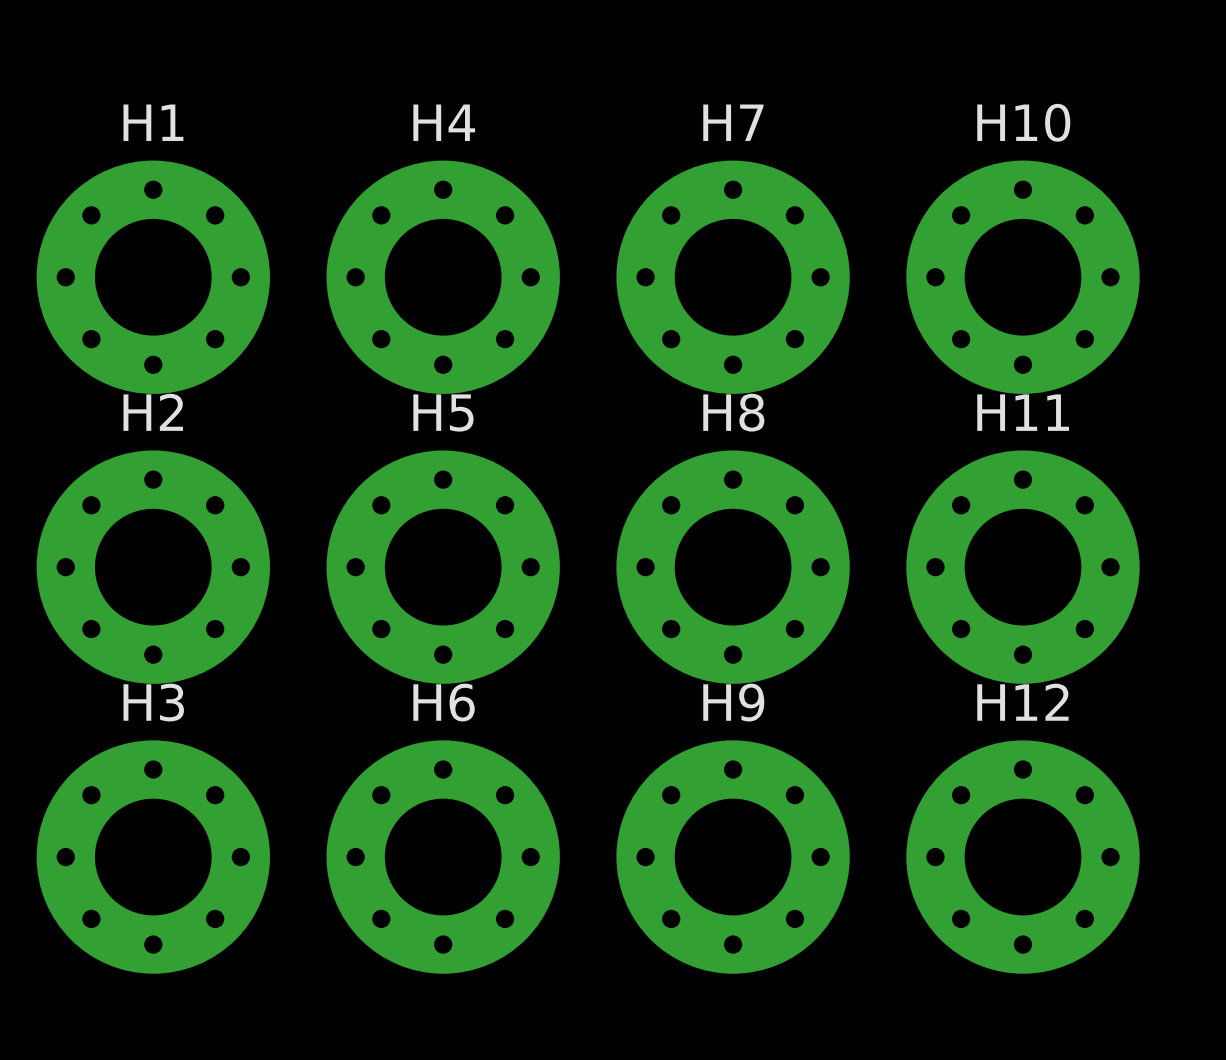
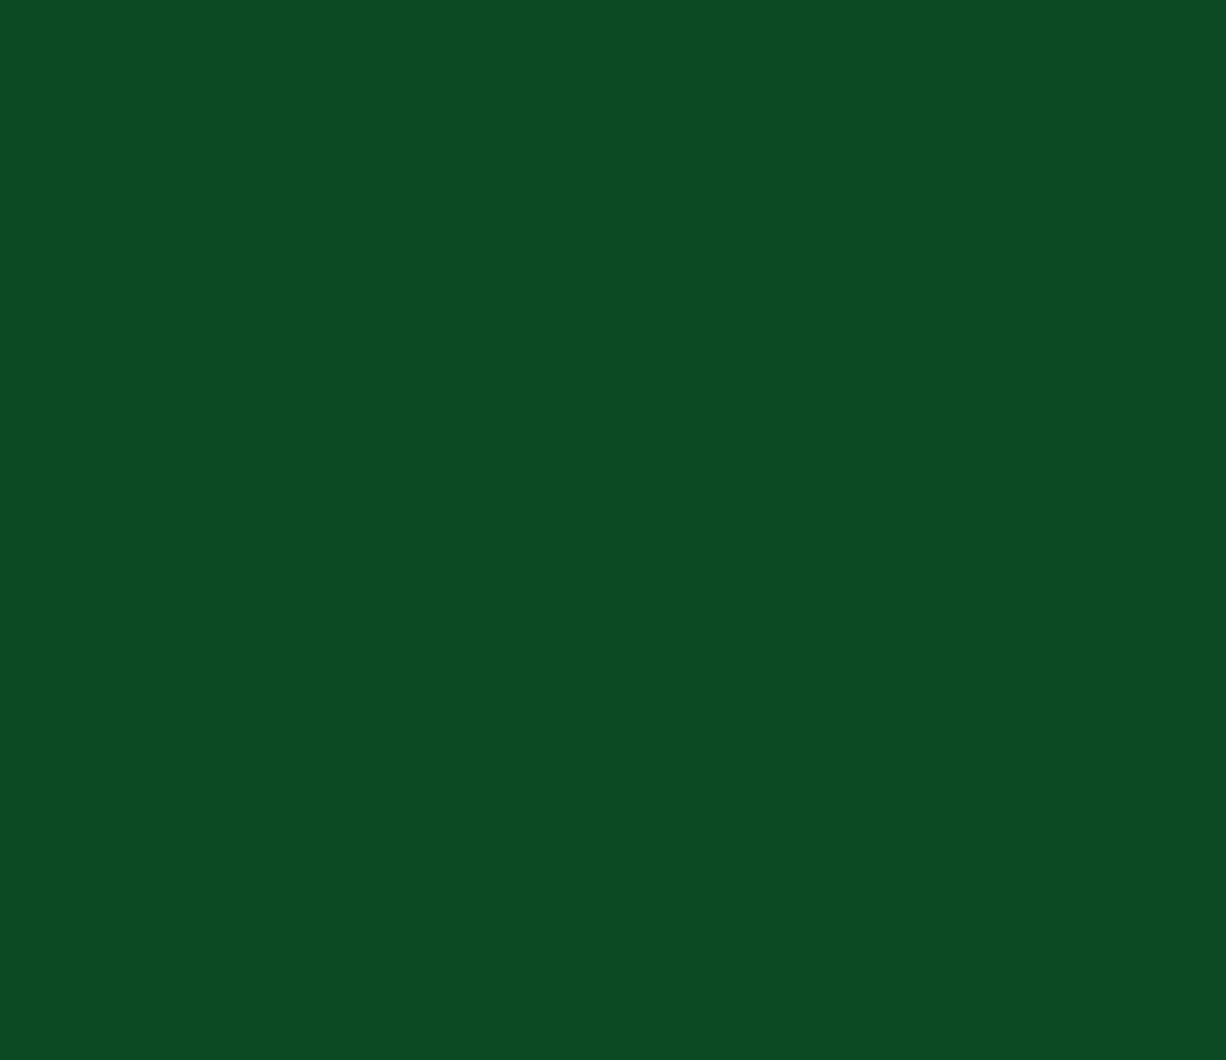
H1: (153, 277) -> none
H4: (443, 277) -> none
H7: (733, 277) -> none
H10: (1022, 277) -> none
H2: (153, 567) -> none
H5: (443, 567) -> none
H8: (733, 567) -> none
H11: (1022, 567) -> none
H3: (153, 857) -> none
H6: (443, 857) -> none
H9: (733, 857) -> none
H12: (1022, 857) -> none

